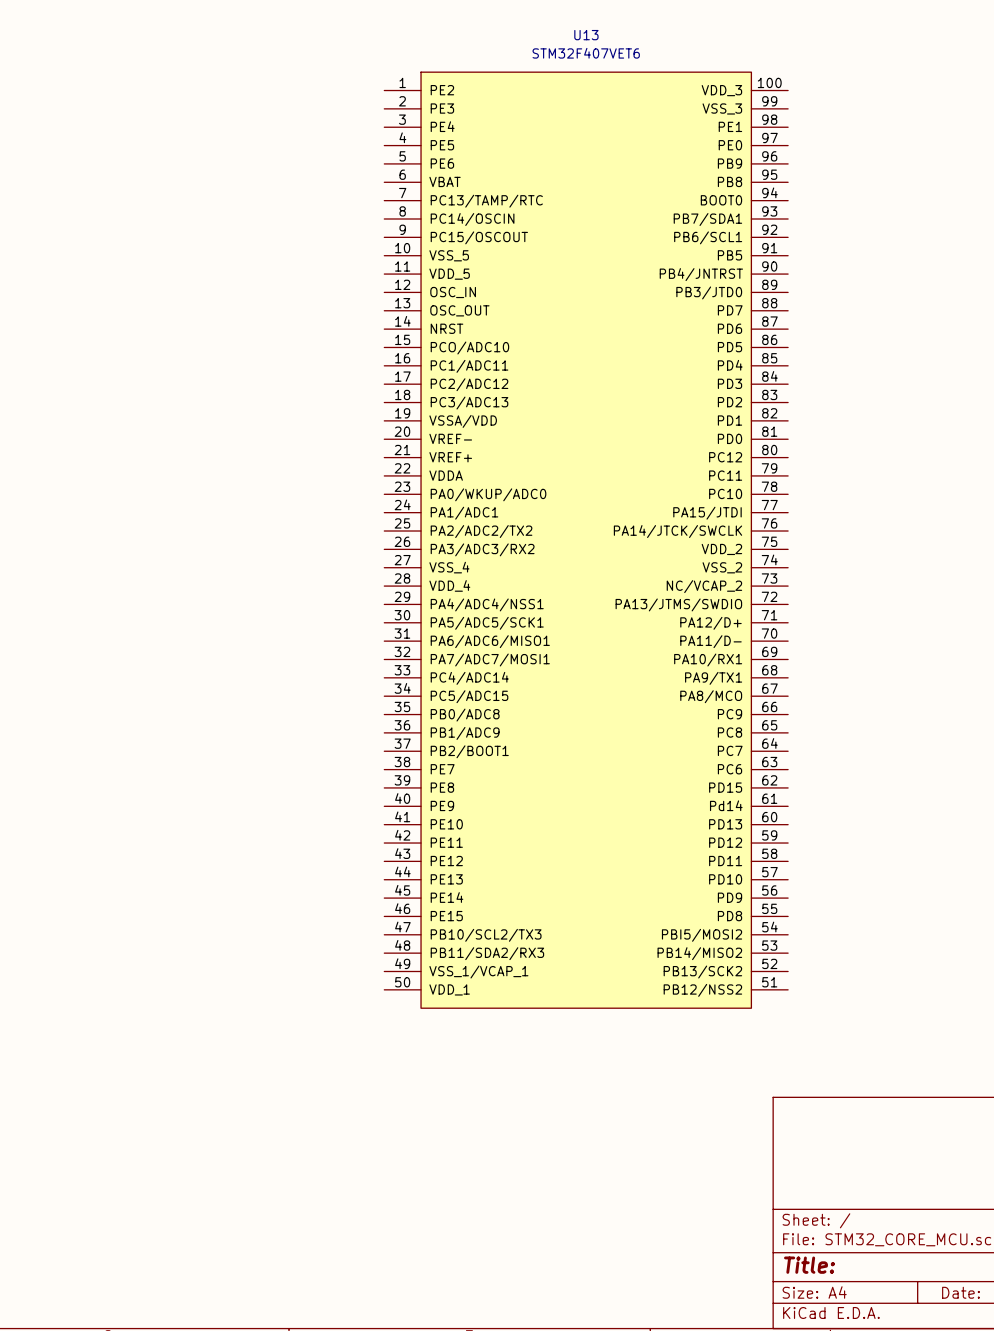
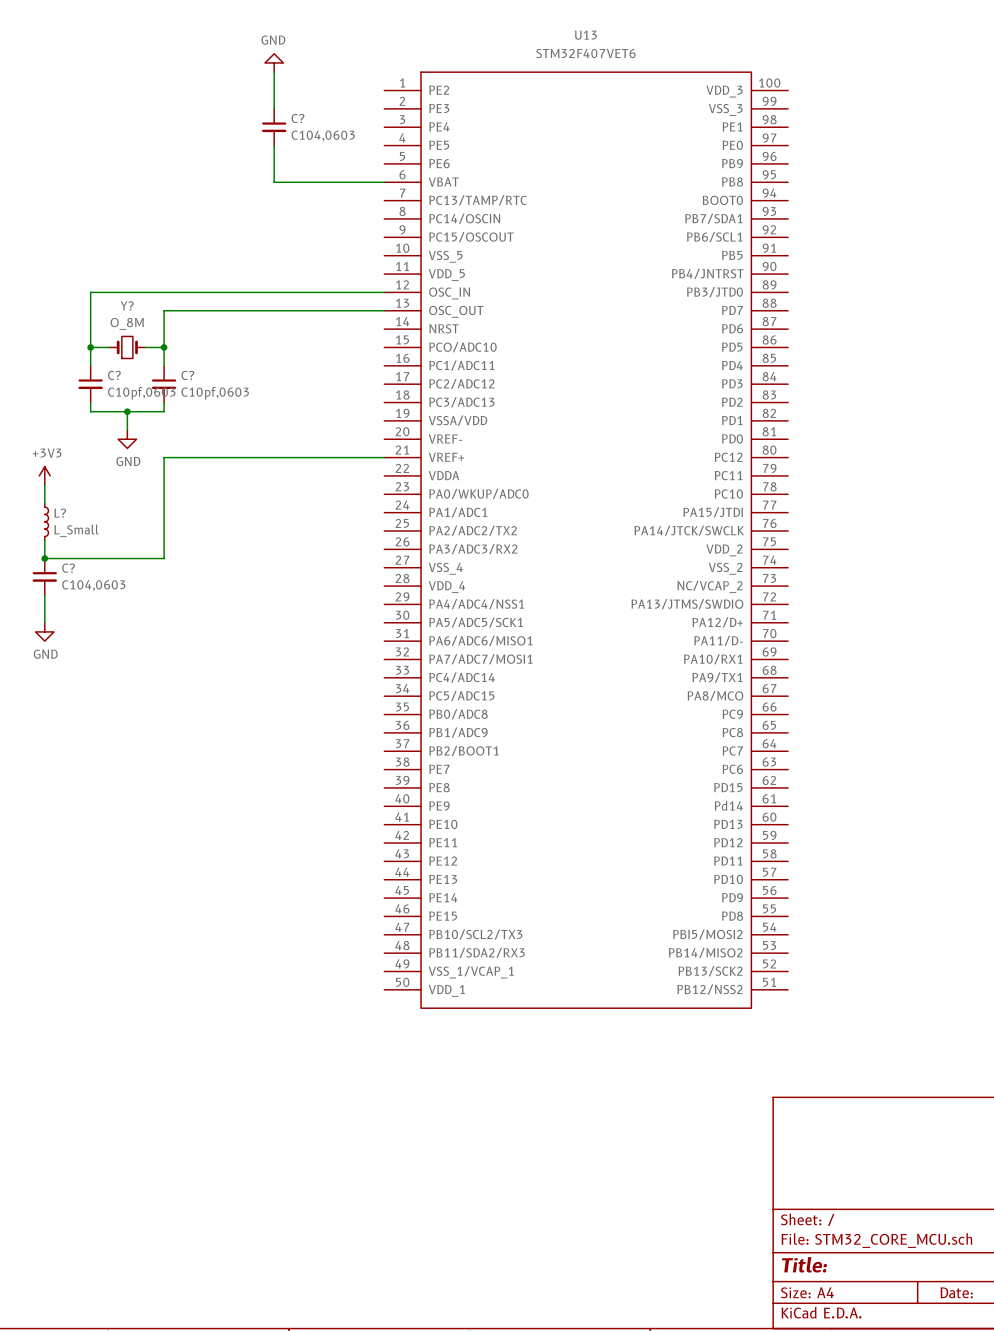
power symbol: none -> GND (274, 62)
wire: none -> (274, 72) (274, 108)
C?: none -> C104,0603 (274, 127)
wire: none -> (274, 145) (274, 182) (384, 182)
wire: none -> (384, 292) (90, 292) (90, 365)
wire: none -> (384, 310) (164, 310) (164, 365)
wire: none -> (90, 347) (109, 347)
junction: none -> (90, 347)
Y?: none -> O_8M (127, 347)
wire: none -> (145, 347) (164, 347)
junction: none -> (164, 347)
C?: none -> C10pf,0603 (90, 384)
C?: none -> C10pf,0603 (164, 384)
wire: none -> (90, 402) (90, 411) (164, 411) (164, 402)
wire: none -> (127, 411) (127, 430)
junction: none -> (127, 411)
power symbol: none -> GND (127, 439)
wire: none -> (384, 457) (164, 457) (164, 558) (44, 558) (44, 540)
power symbol: none -> +3V3 (44, 475)
wire: none -> (44, 485) (44, 503)
L?: none -> L_Small (46, 521)
junction: none -> (44, 558)
C?: none -> C104,0603 (44, 576)
wire: none -> (44, 595) (44, 622)
power symbol: none -> GND (44, 631)

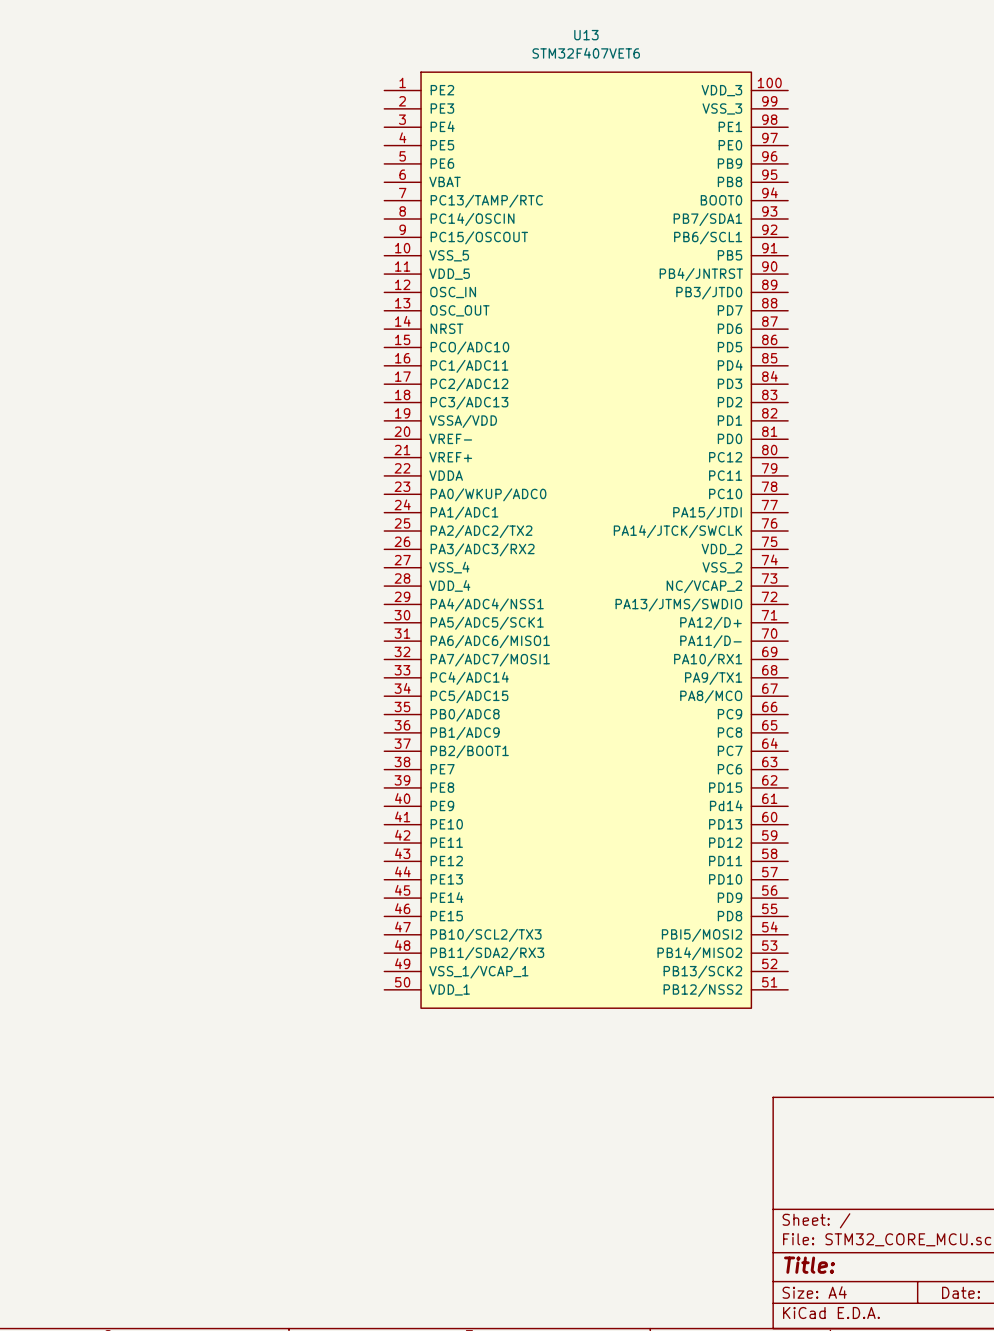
power symbol: GND (274, 62) -> none
wire: (274, 72) (274, 108) -> none
C?: C104,0603 (274, 127) -> none
wire: (274, 145) (274, 182) (384, 182) -> none
wire: (384, 292) (90, 292) (90, 365) -> none
wire: (384, 310) (164, 310) (164, 365) -> none
wire: (90, 347) (109, 347) -> none
junction: (90, 347) -> none
Y?: O_8M (127, 347) -> none
wire: (145, 347) (164, 347) -> none
junction: (164, 347) -> none
C?: C10pf,0603 (90, 384) -> none
C?: C10pf,0603 (164, 384) -> none
wire: (90, 402) (90, 411) (164, 411) (164, 402) -> none
wire: (127, 411) (127, 430) -> none
junction: (127, 411) -> none
power symbol: GND (127, 439) -> none
wire: (384, 457) (164, 457) (164, 558) (44, 558) (44, 540) -> none
power symbol: +3V3 (44, 475) -> none
wire: (44, 485) (44, 503) -> none
L?: L_Small (46, 521) -> none
junction: (44, 558) -> none
C?: C104,0603 (44, 576) -> none
wire: (44, 595) (44, 622) -> none
power symbol: GND (44, 631) -> none

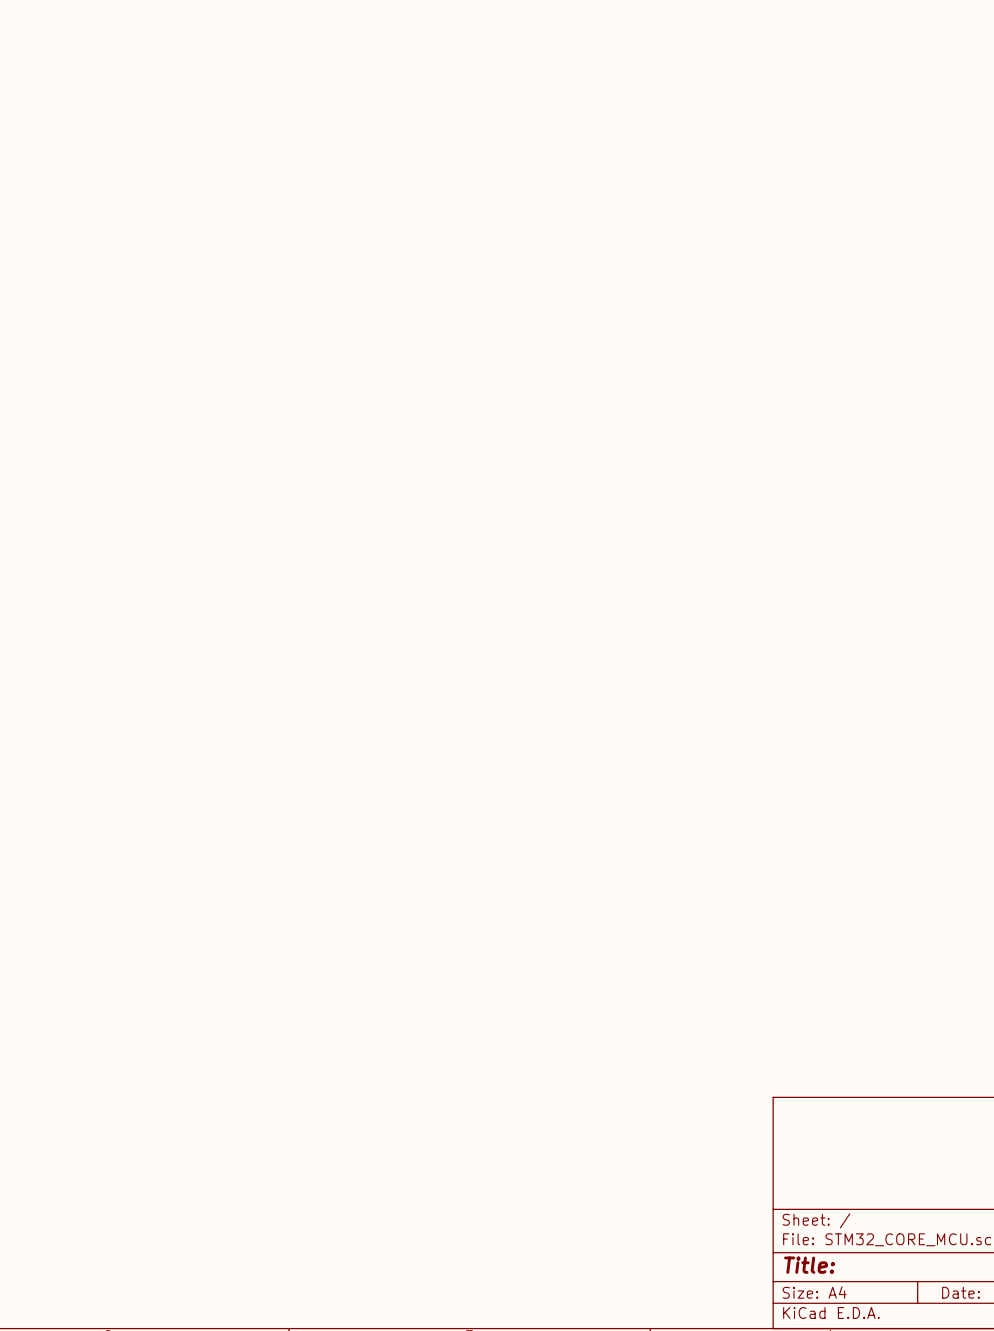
U13: STM32F407VET6 (586, 540) -> none

